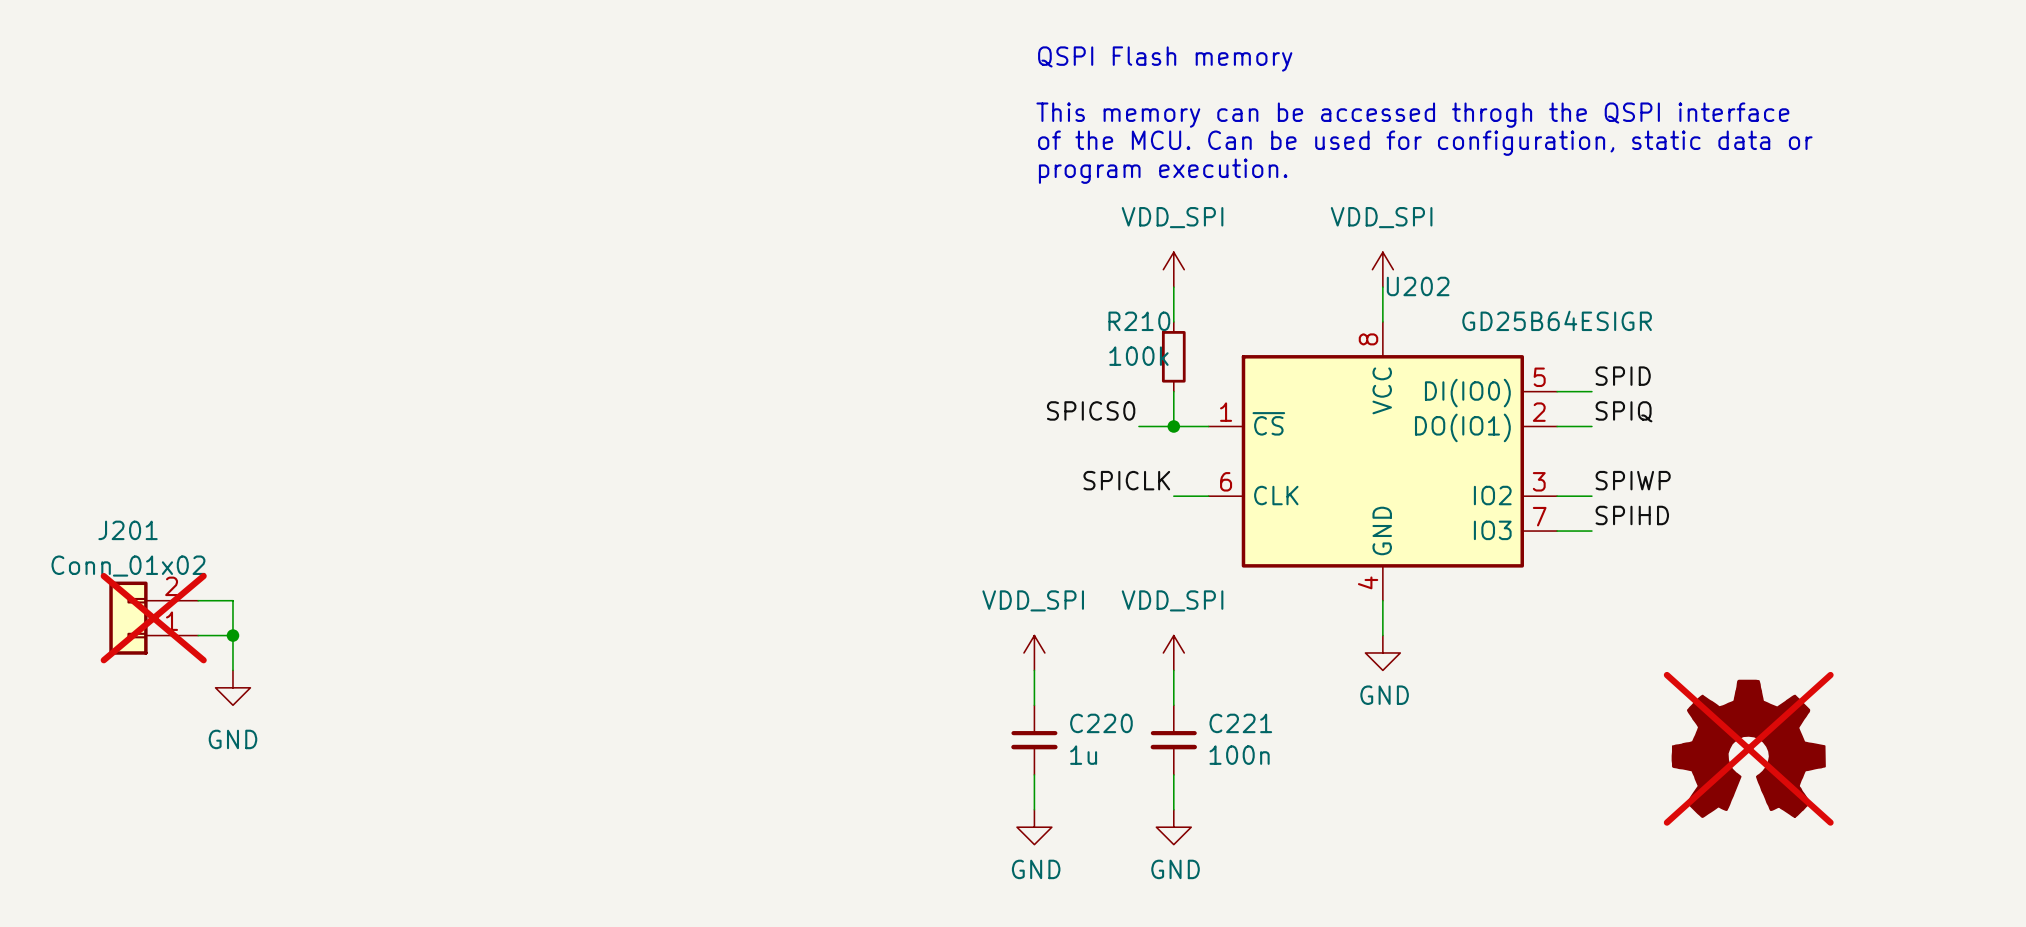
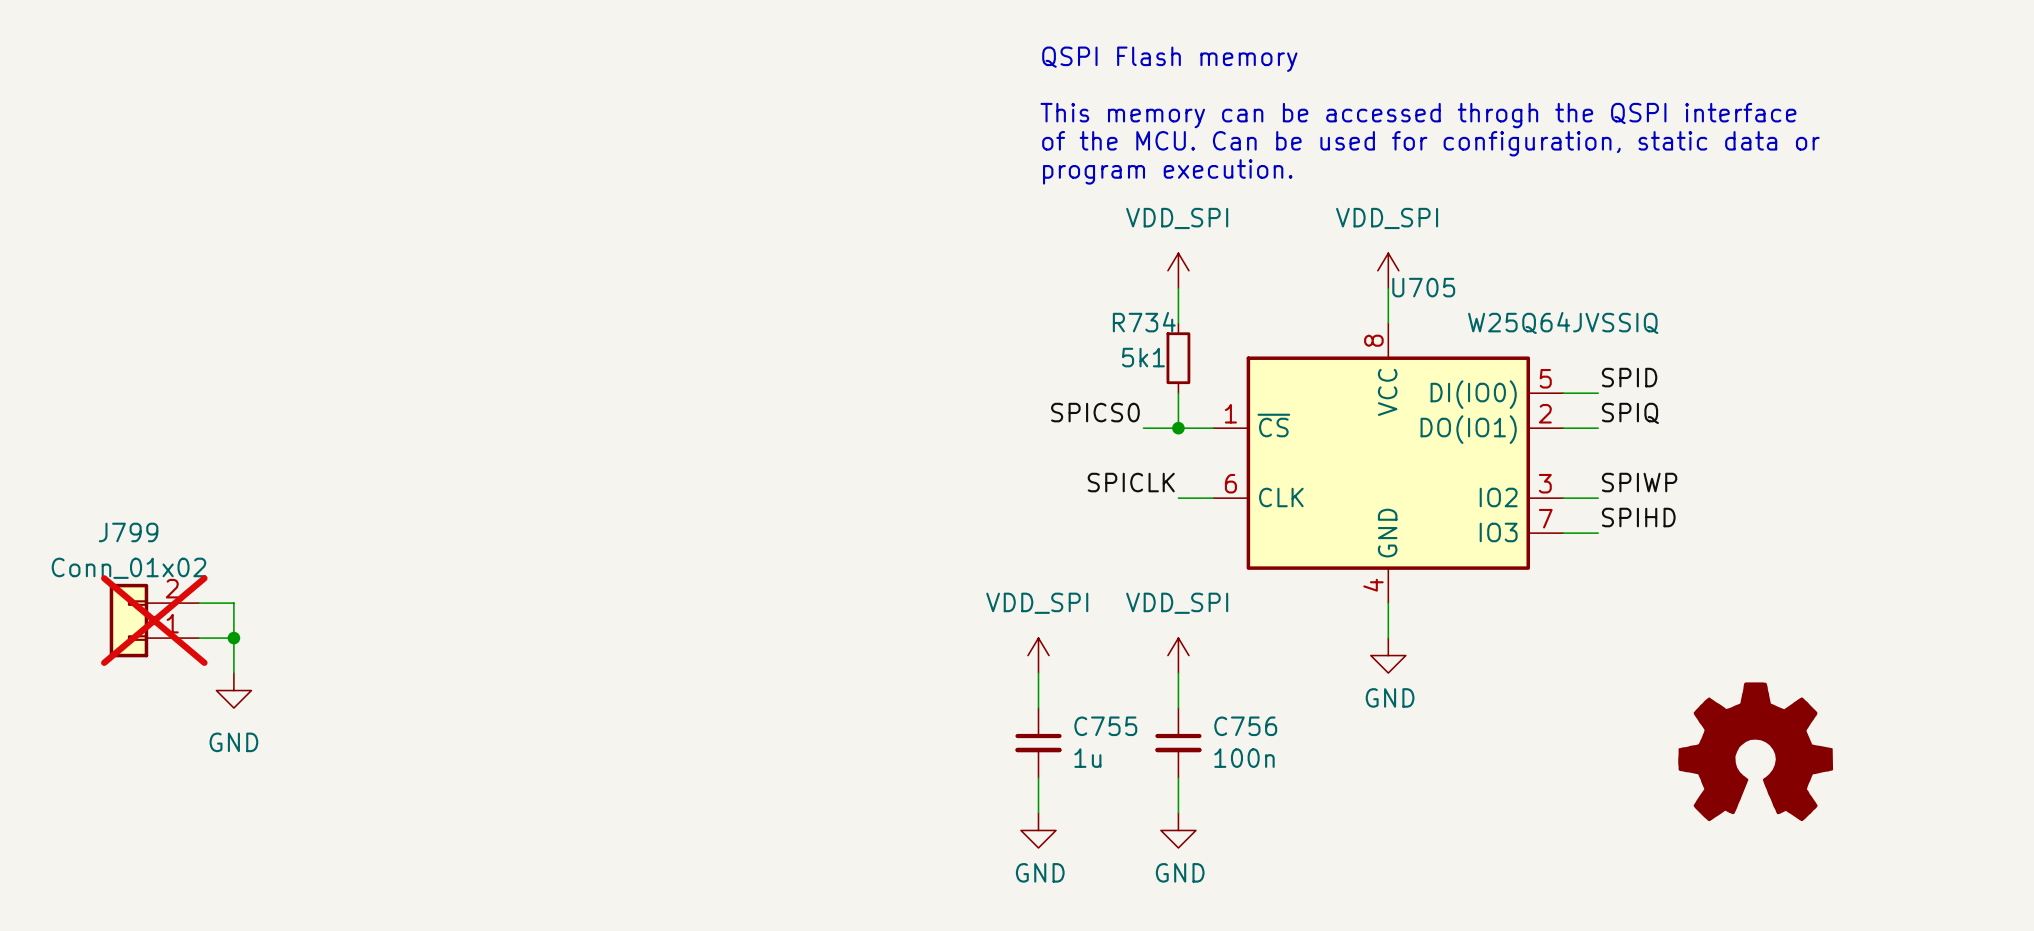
U202 name: U202 (1418, 286) -> U705 (1423, 287)
U202 value: GD25B64ESIGR (1557, 320) -> W25Q64JVSSIQ (1563, 322)
R210 name: R210 (1139, 321) -> R734 (1144, 322)
R210 value: 100k (1138, 356) -> 5k1 (1143, 357)
J201 name: J201 (128, 530) -> J799 (128, 532)
C220 name: C220 (1101, 723) -> C755 (1105, 726)
C221 name: C221 (1240, 723) -> C756 (1245, 726)
part do-not-place cross: (1748, 748) -> none

